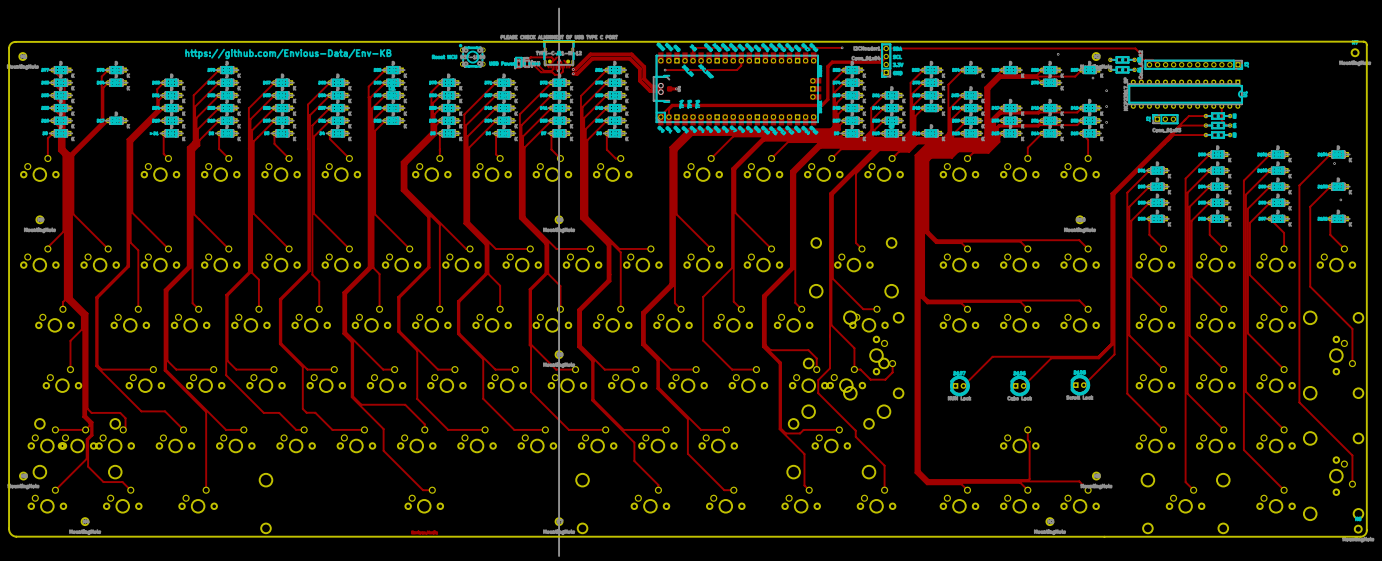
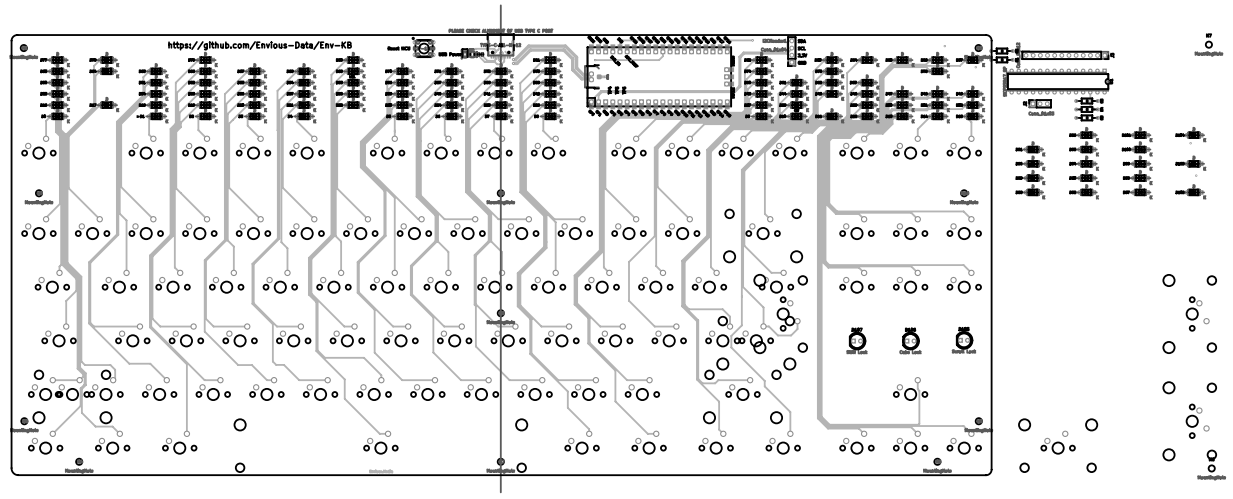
board edge: (15, 41) (1365, 42) (1366, 44) (1365, 533) (1360, 536) (1104, 536) -> (17, 35) (988, 35) (991, 40) (991, 469) (989, 473) (985, 475)
track: (886, 48) (1135, 48) (1141, 54) (1141, 82) -> none
via: (1106, 90) -> none
via: (1106, 106) -> none
track: (1205, 116) (1188, 116) (1111, 193) (1111, 343) (1098, 356) (992, 356) (963, 385) -> none
via: (1106, 122) -> none
track: (1205, 125) (1181, 125) (1112, 194) (1112, 344) (1099, 358) (1051, 358) (1023, 385) -> none
track: (1205, 135) (1173, 135) (1114, 194) (1114, 354) (1083, 385) -> none
track: (1209, 154) (1185, 178) (1185, 482) (1193, 490) -> none
track: (1270, 154) (1243, 180) (1243, 450) (1284, 490) -> none
track: (1330, 154) (1299, 185) (1299, 402) (1352, 455) (1352, 484) -> none
track: (1149, 170) (1127, 192) (1127, 393) (1163, 429) -> none
track: (1209, 170) (1187, 192) (1187, 393) (1223, 429) -> none
track: (1270, 170) (1245, 194) (1245, 391) (1284, 429) -> none
track: (1149, 186) (1129, 206) (1129, 335) (1163, 369) -> none
track: (1209, 186) (1189, 206) (1189, 335) (1223, 369) -> none
track: (1270, 186) (1247, 208) (1247, 333) (1284, 369) -> none
track: (1330, 186) (1310, 206) (1310, 286) (1352, 328) (1352, 363) -> none
track: (1149, 202) (1131, 220) (1131, 277) (1163, 309) -> none
track: (1209, 202) (1191, 220) (1191, 277) (1223, 309) -> none
track: (1270, 202) (1249, 222) (1249, 275) (1284, 309) -> none
track: (1149, 218) (1149, 234) (1163, 248) -> none
track: (1209, 218) (1209, 234) (1223, 248) -> none
track: (1270, 218) (1284, 232) (1284, 248) -> none
track: (1330, 218) (1330, 234) (1344, 248) -> none
part: (1155, 258) -> none
part: (1215, 258) -> none
part: (1276, 258) -> none
part: (1336, 258) -> none
part: (1155, 318) -> none
part: (1215, 318) -> none
part: (1276, 318) -> none
part: (1155, 379) -> none
part: (1215, 379) -> none
part: (1276, 379) -> none
part: (1155, 439) -> none
part: (1215, 439) -> none
part: (1276, 439) -> none
part: (1276, 499) -> none

